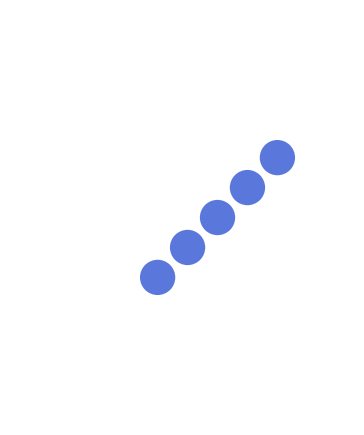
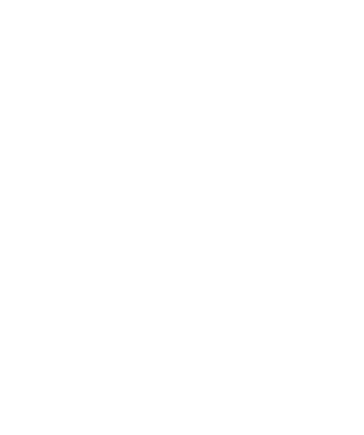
part: (217, 217) -> none

